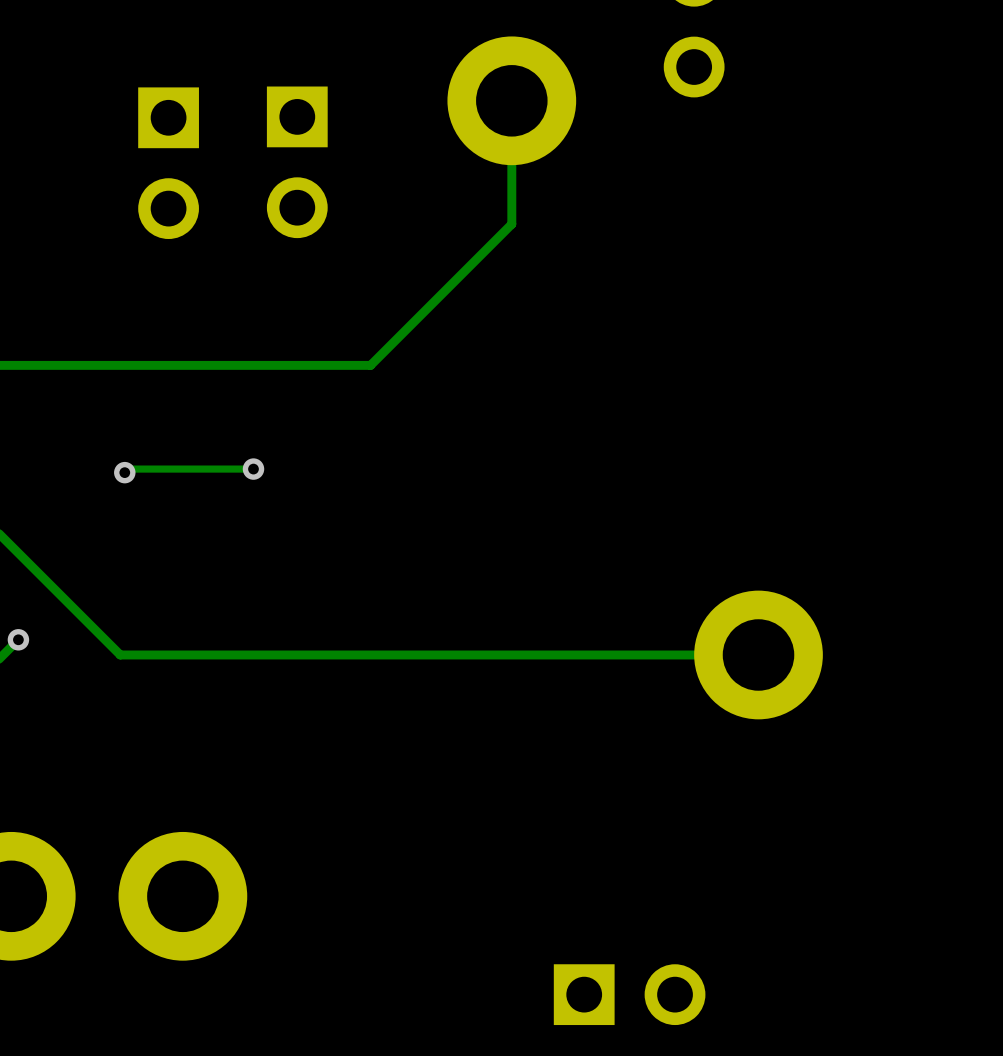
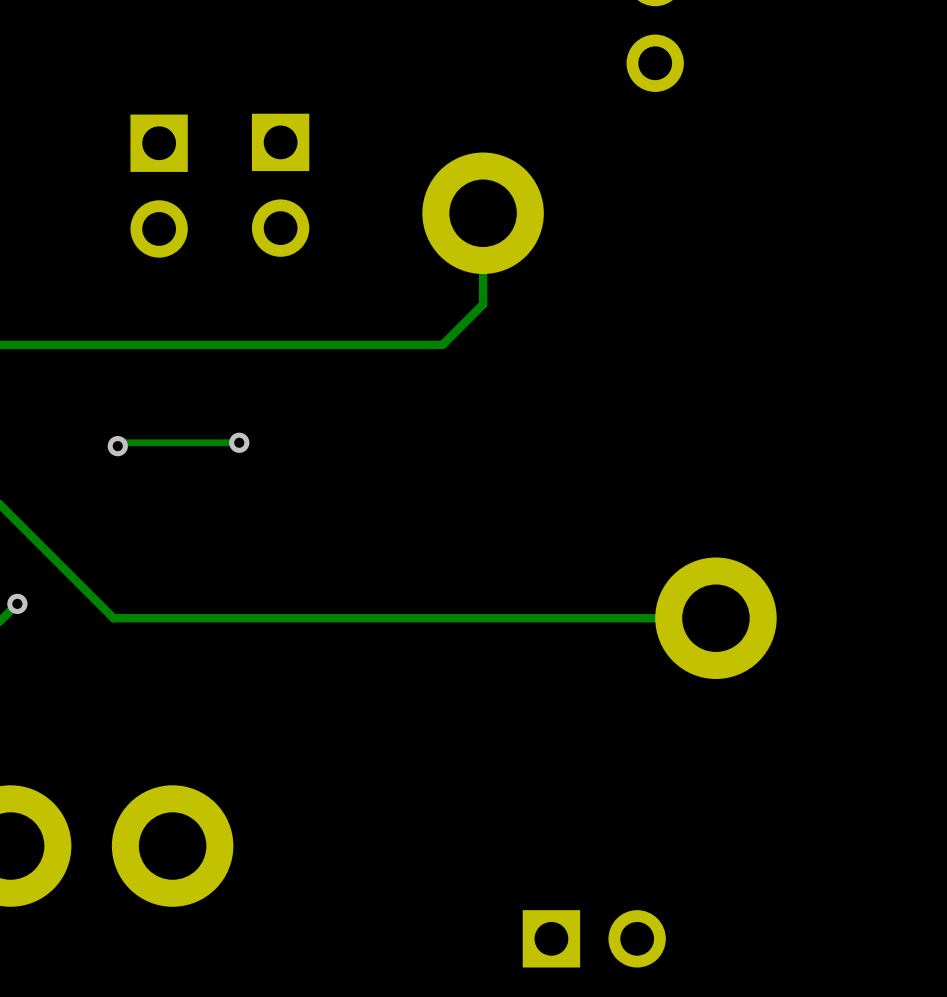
track: (511, 100) (511, 224) (370, 365) -> (483, 213) (483, 304) (442, 344) (349, 344)
part position: (511, 100) -> (483, 213)
part position: (297, 162) -> (280, 185)
part position: (168, 163) -> (159, 186)

